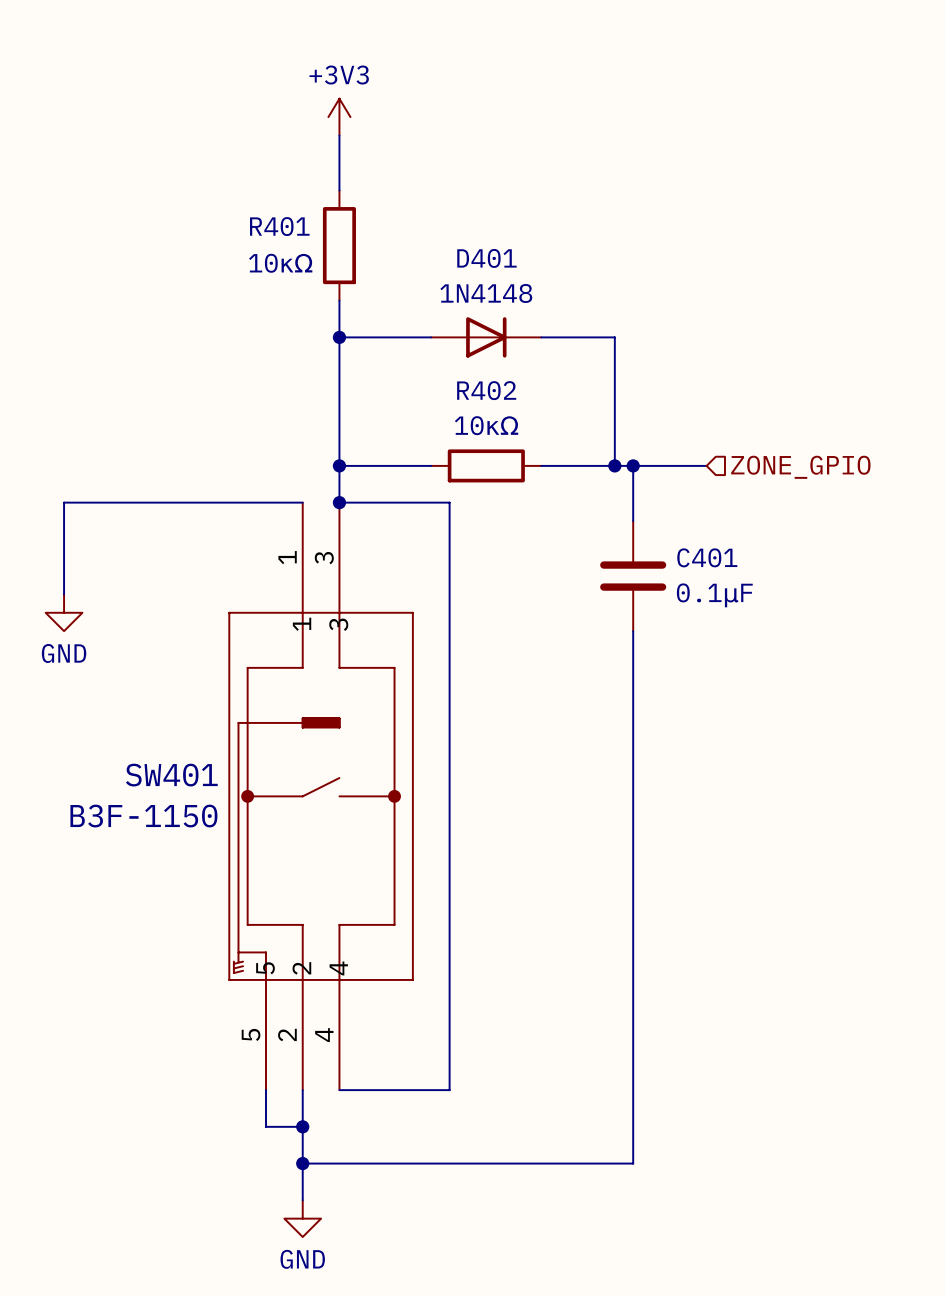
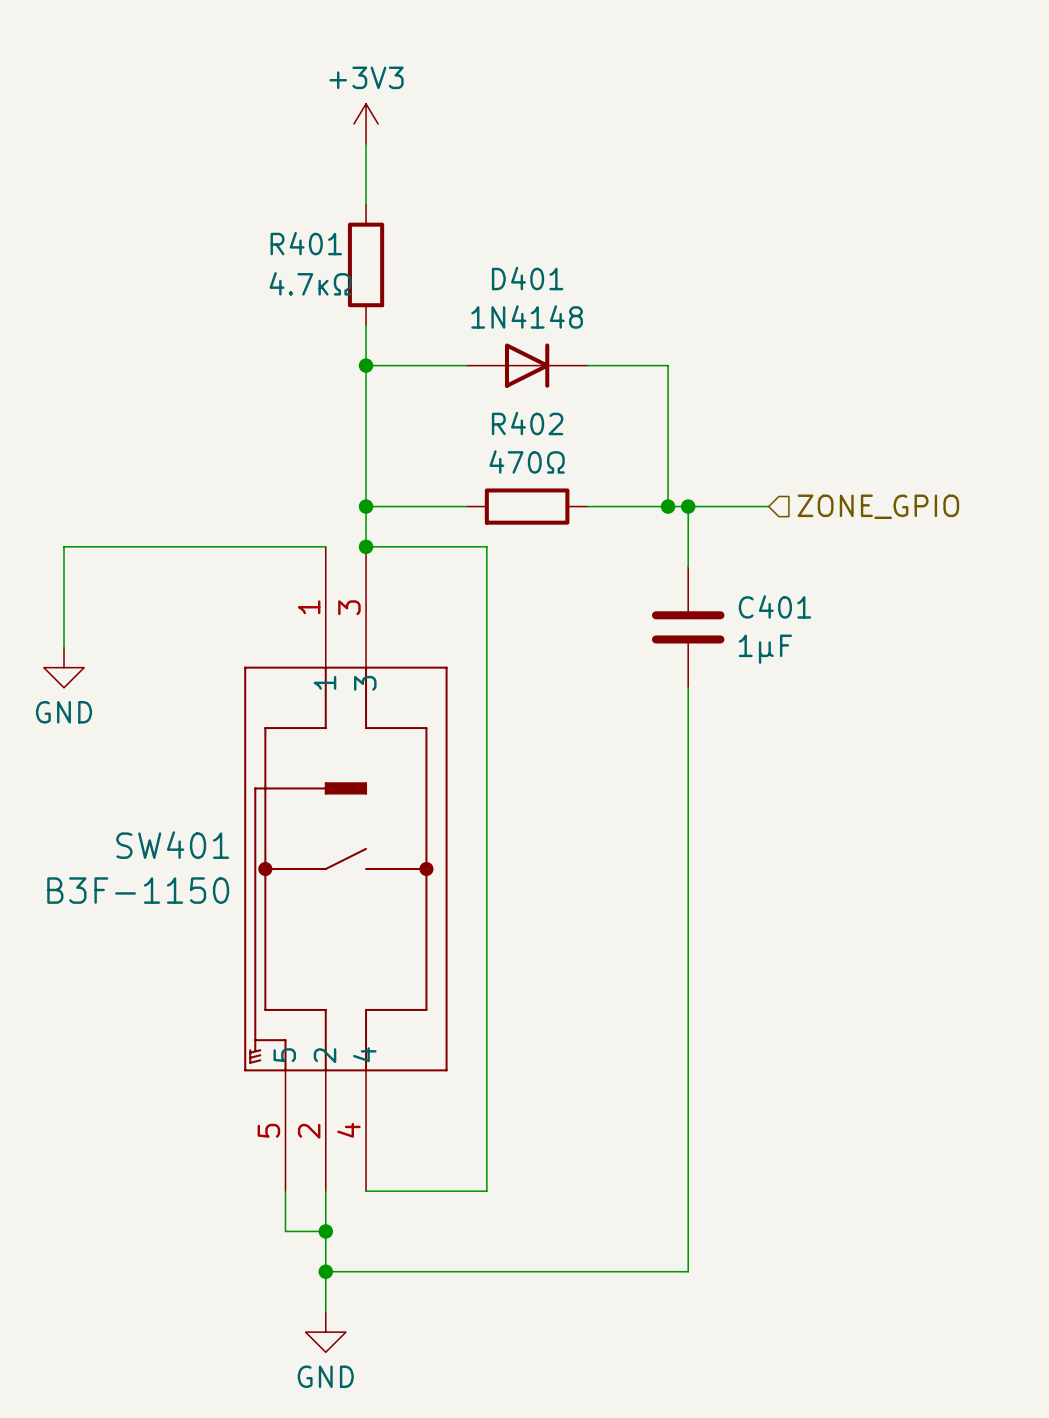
R401 value: 10κΩ (280, 263) -> 4.7κΩ (310, 283)
R402 value: 10κΩ (486, 425) -> 470Ω (527, 461)
C401 value: 0.1μF (714, 595) -> 1μF (765, 649)

